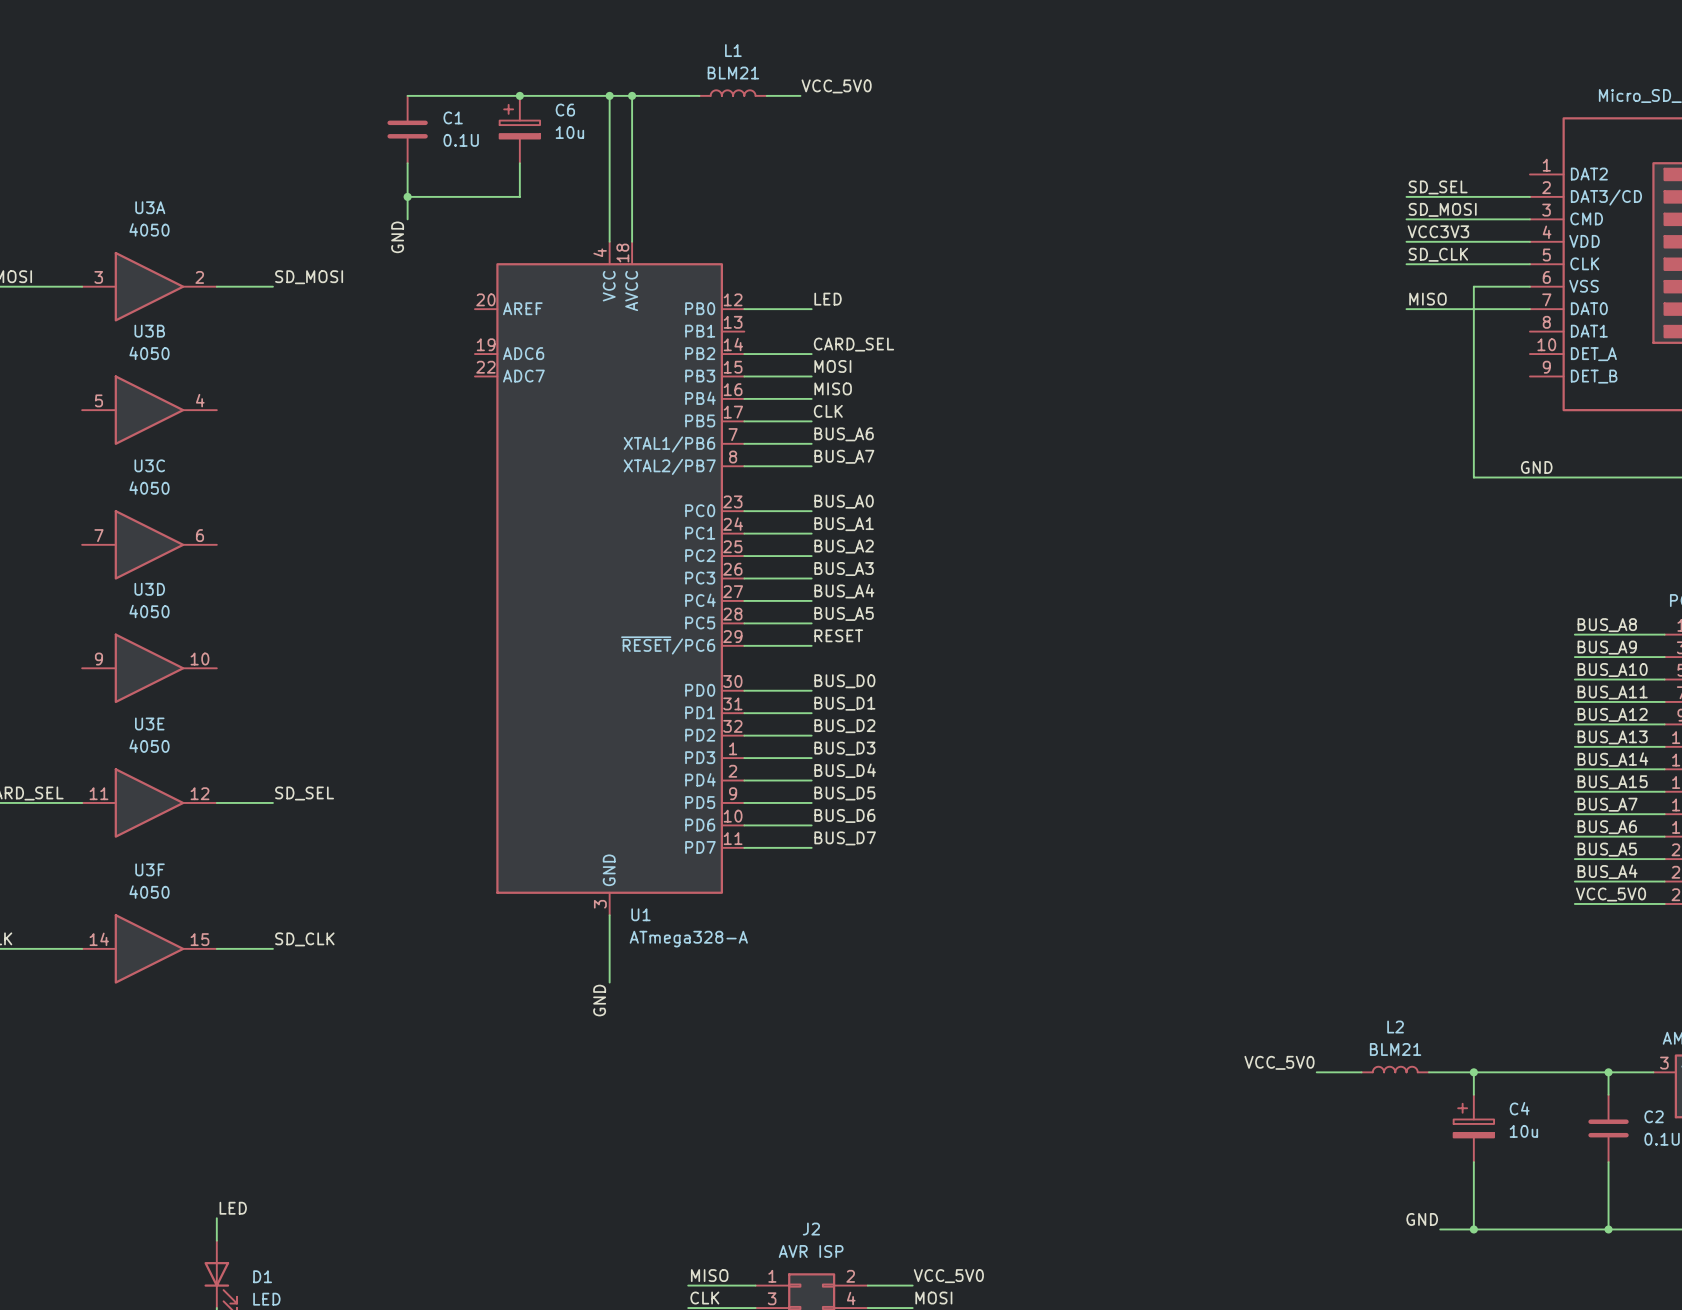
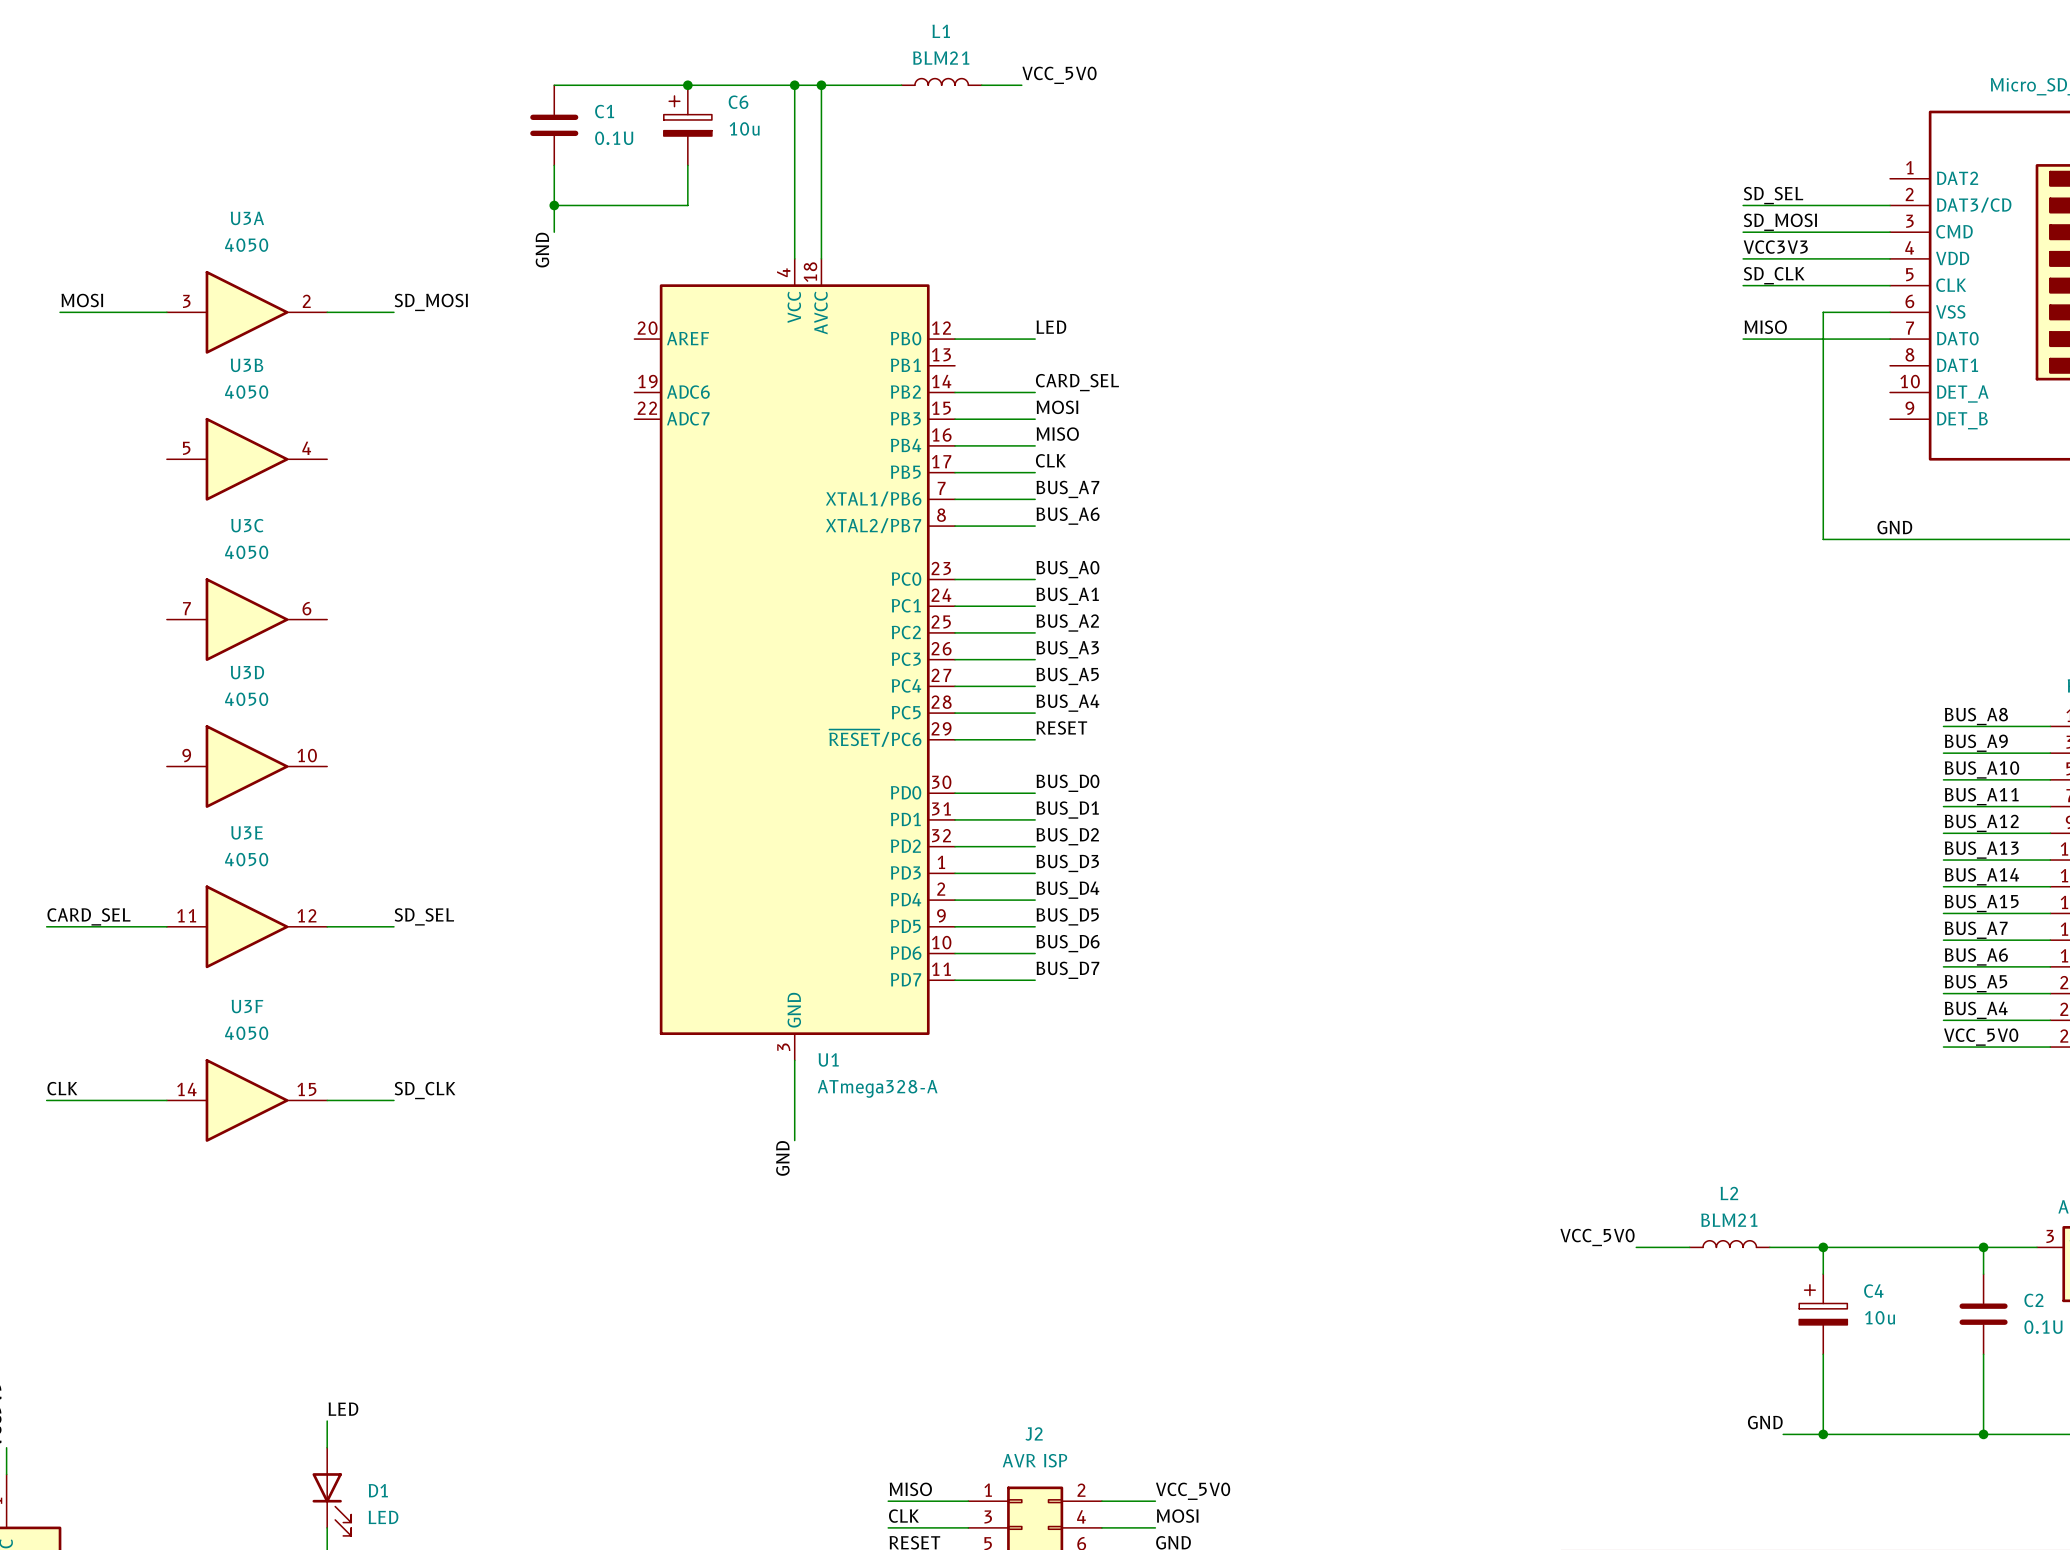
label: BUS_A6 (844, 434) -> BUS_A7 (1067, 489)
label: BUS_A7 (844, 456) -> BUS_A6 (1068, 516)
label: BUS_A4 (844, 591) -> BUS_A5 (1067, 676)
label: BUS_A5 (844, 613) -> BUS_A4 (1067, 703)

